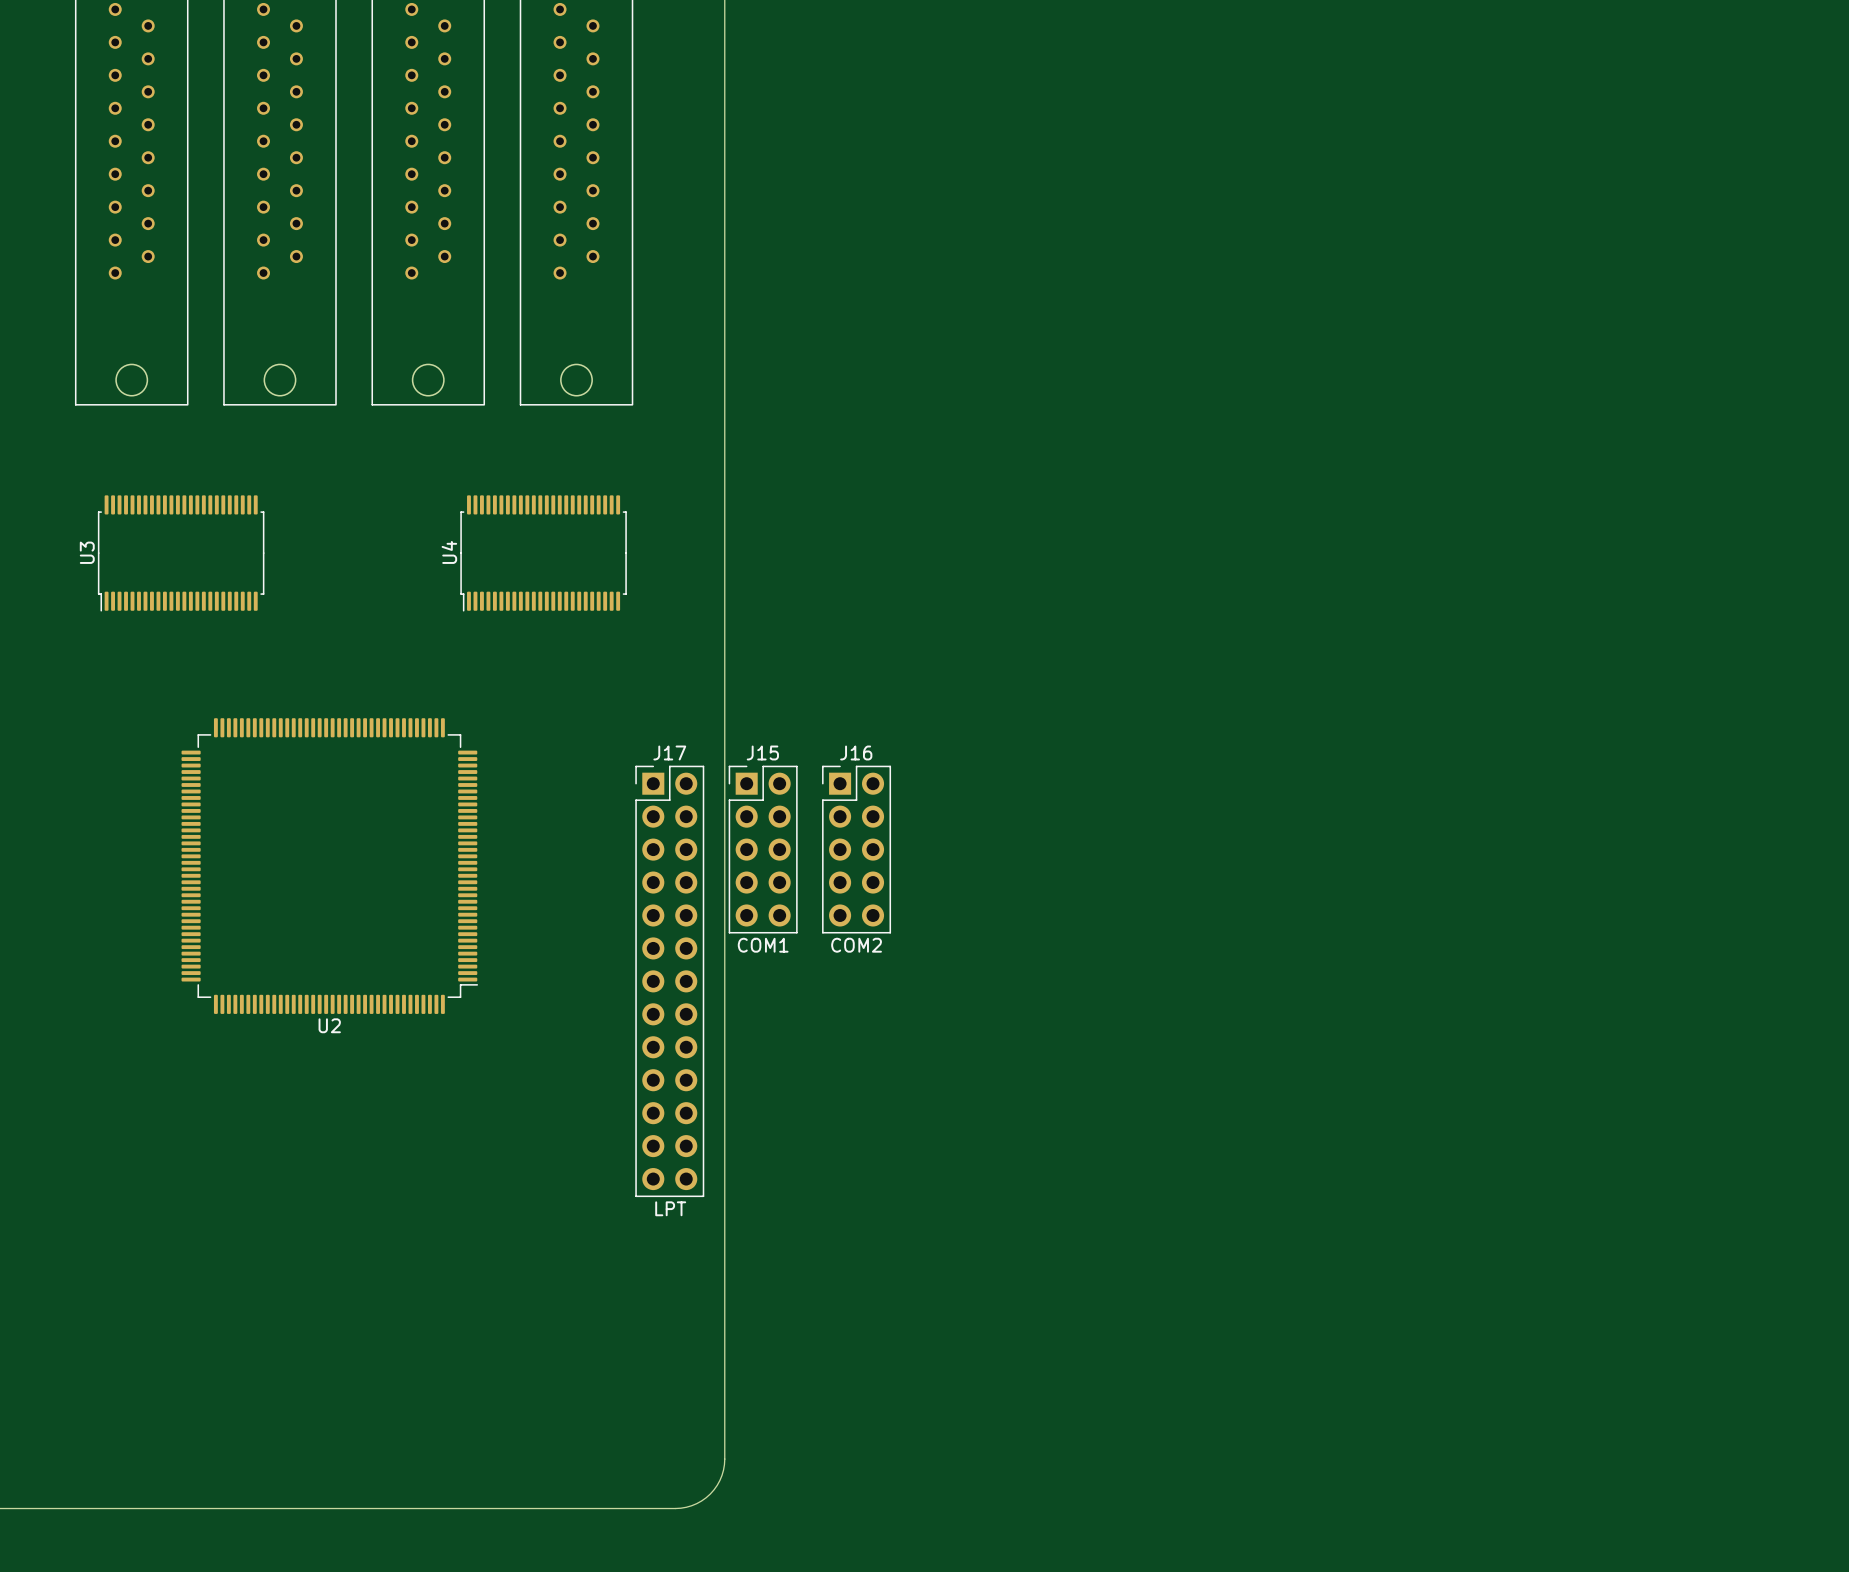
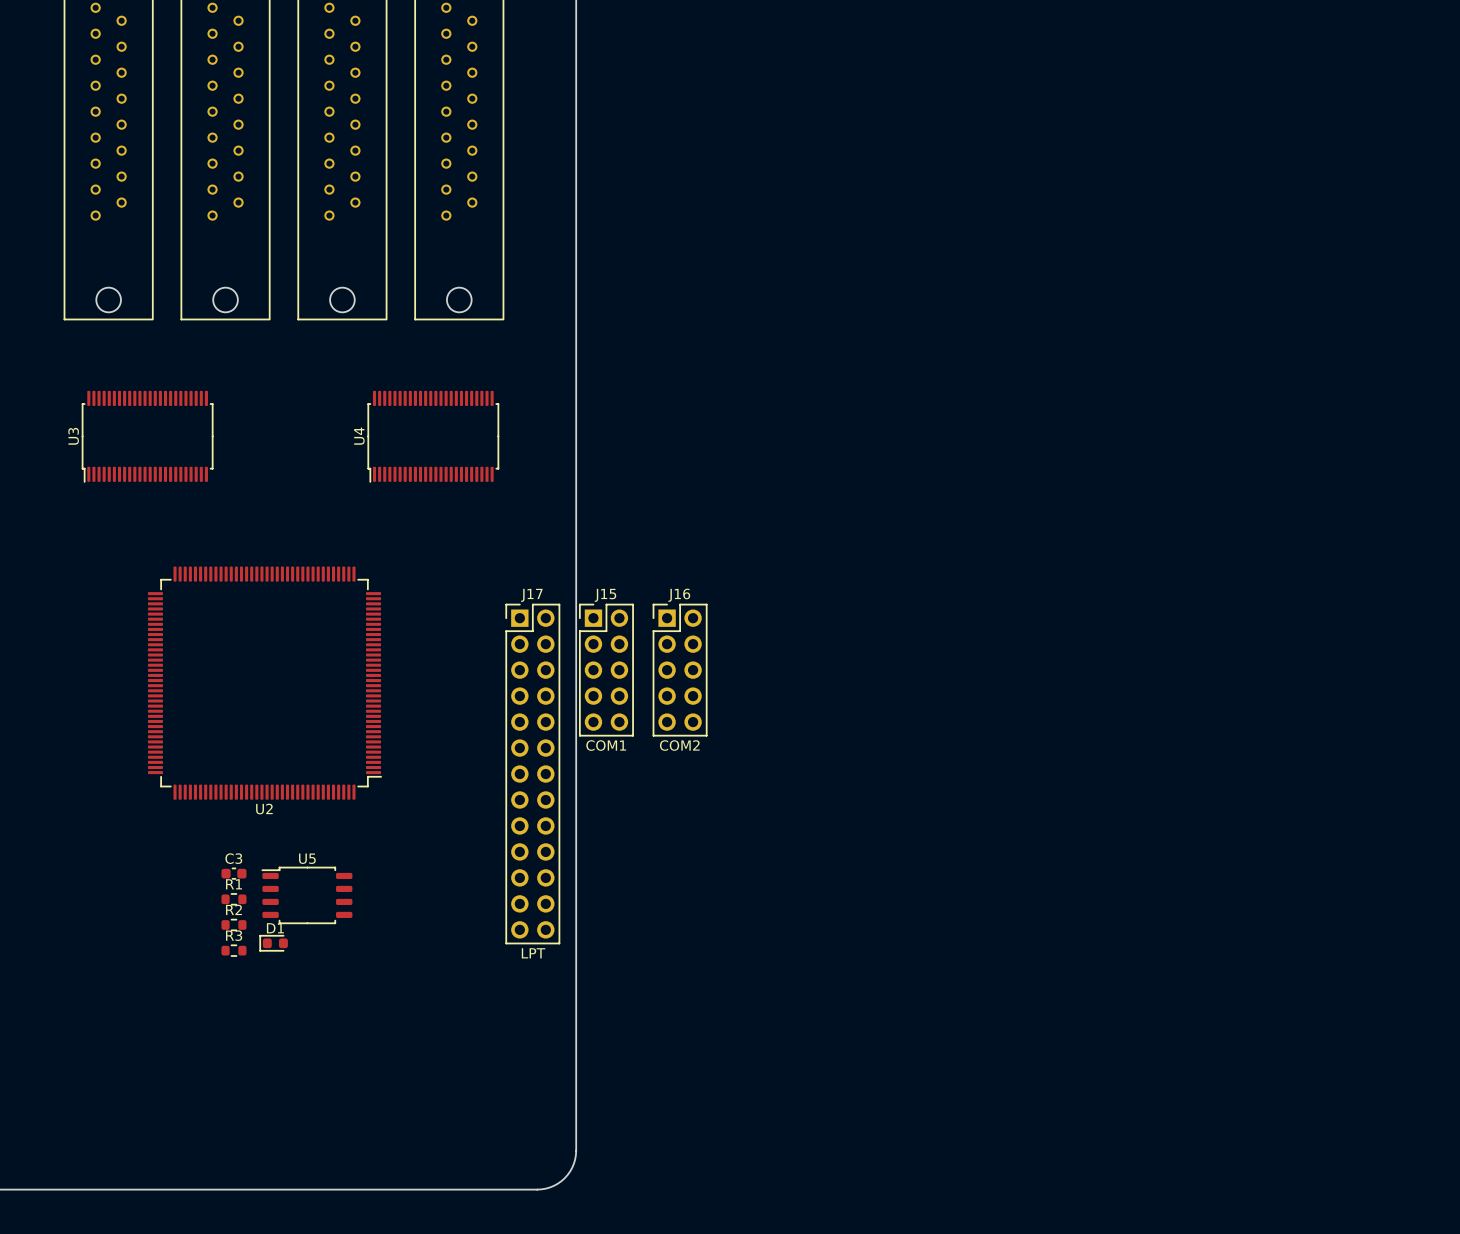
C3: none -> (233, 873)
U5: none -> (307, 895)
R1: none -> (233, 899)
R2: none -> (233, 924)
D1: none -> (273, 943)
R3: none -> (233, 950)

